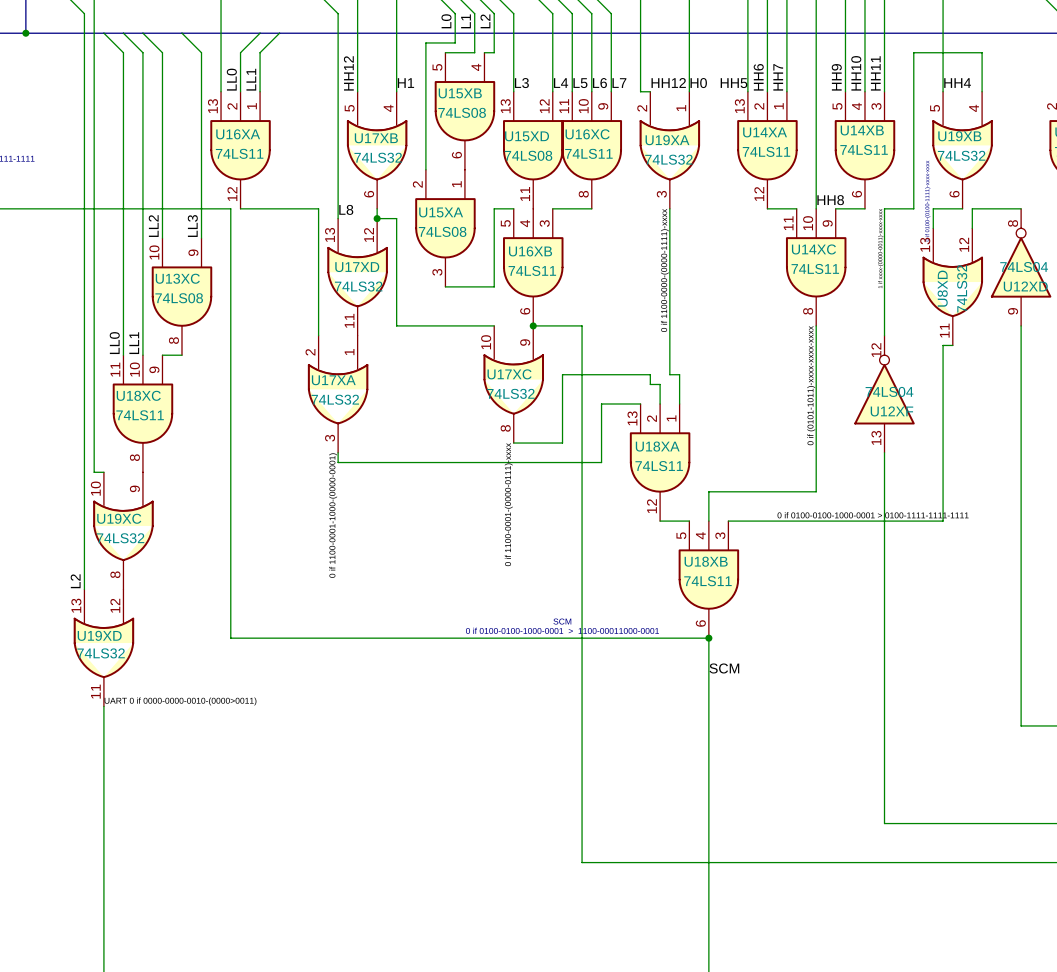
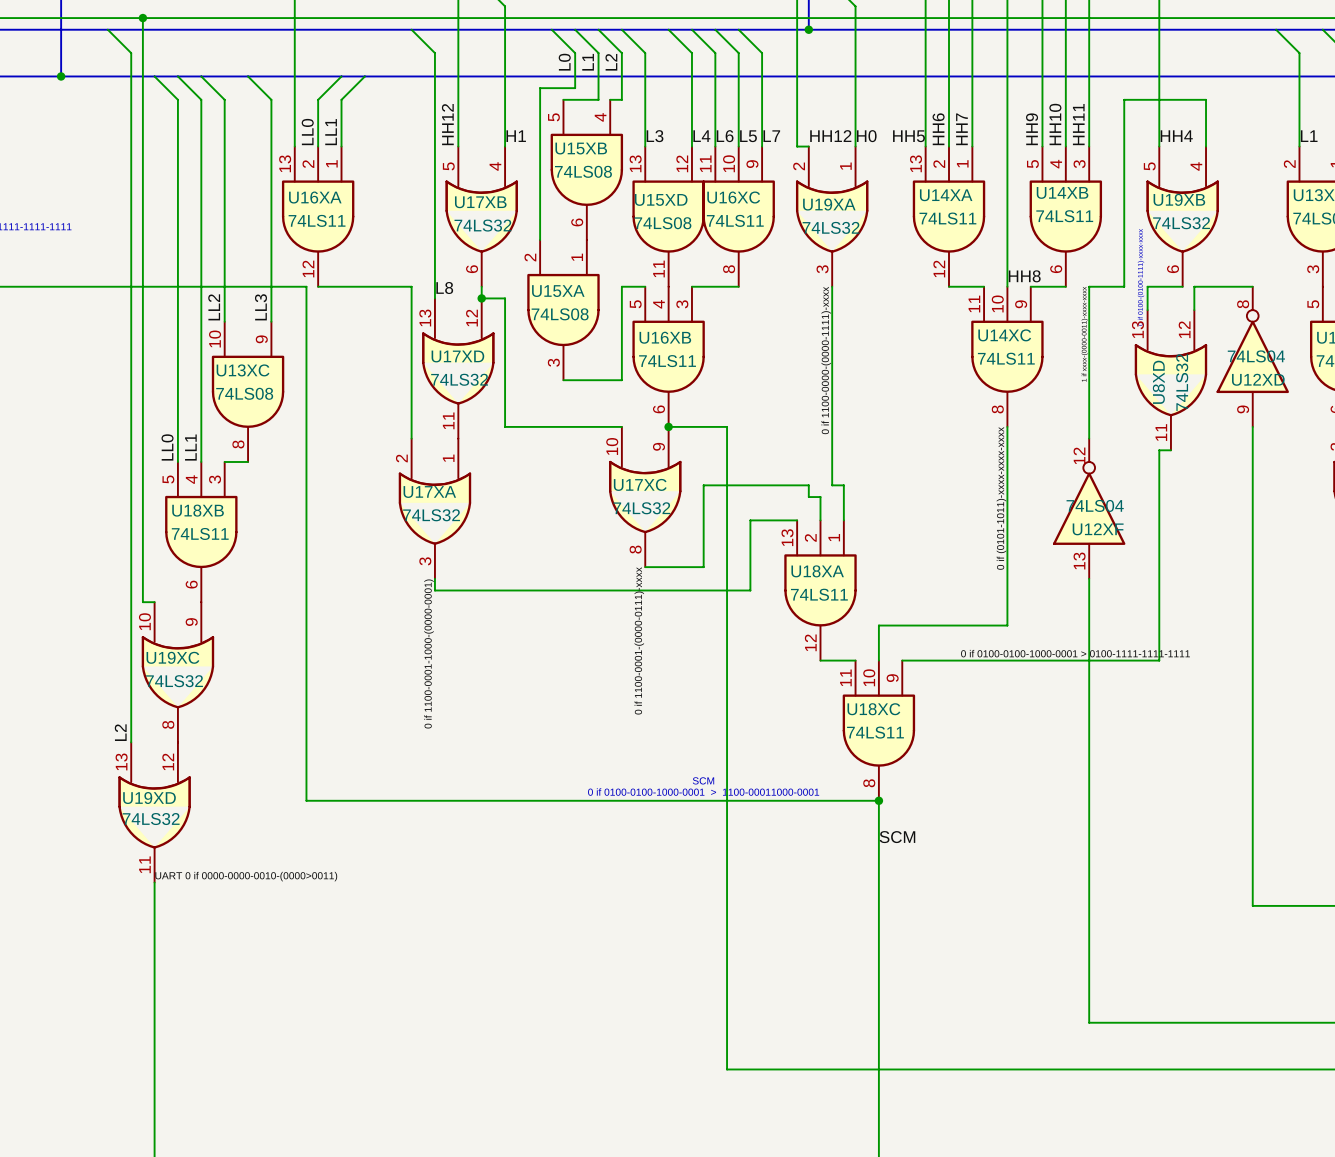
label: L5 (580, 83) -> L6 (725, 136)
label: L6 (599, 83) -> L5 (748, 136)
U18XC position: (142, 413) -> (878, 730)
U18XB position: (708, 579) -> (201, 532)

